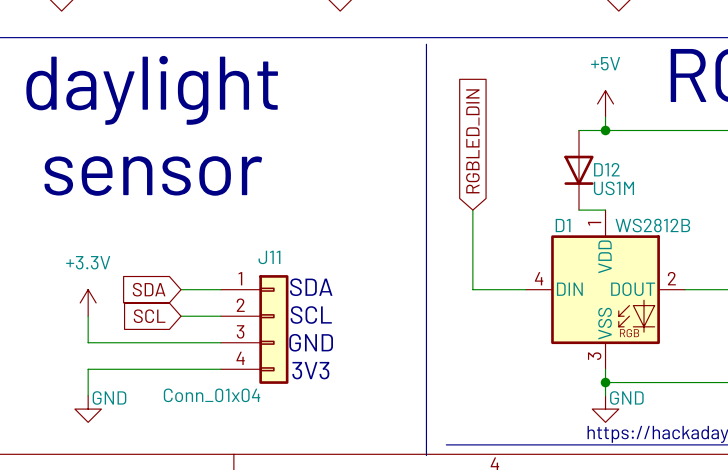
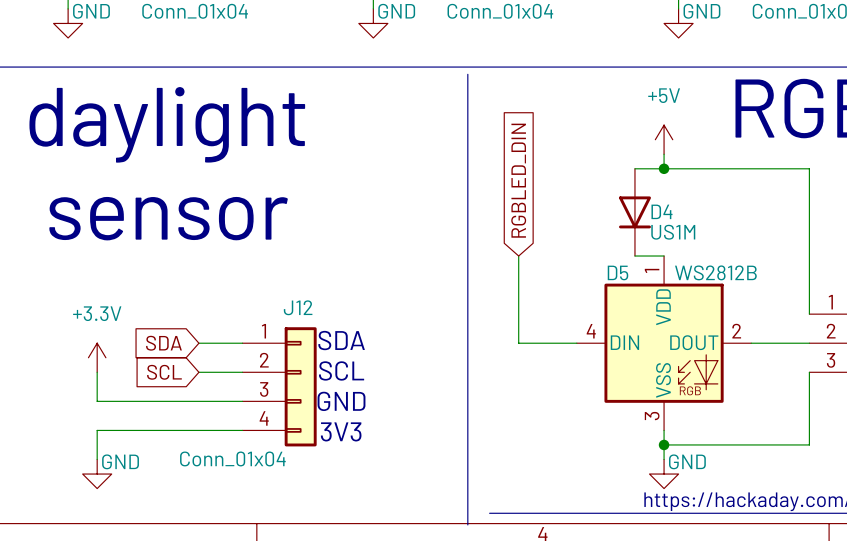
D12 name: D12 (606, 169) -> D4 (661, 211)
D1 name: D1 (563, 225) -> D5 (617, 272)
J11 name: J11 (269, 257) -> J12 (298, 307)

